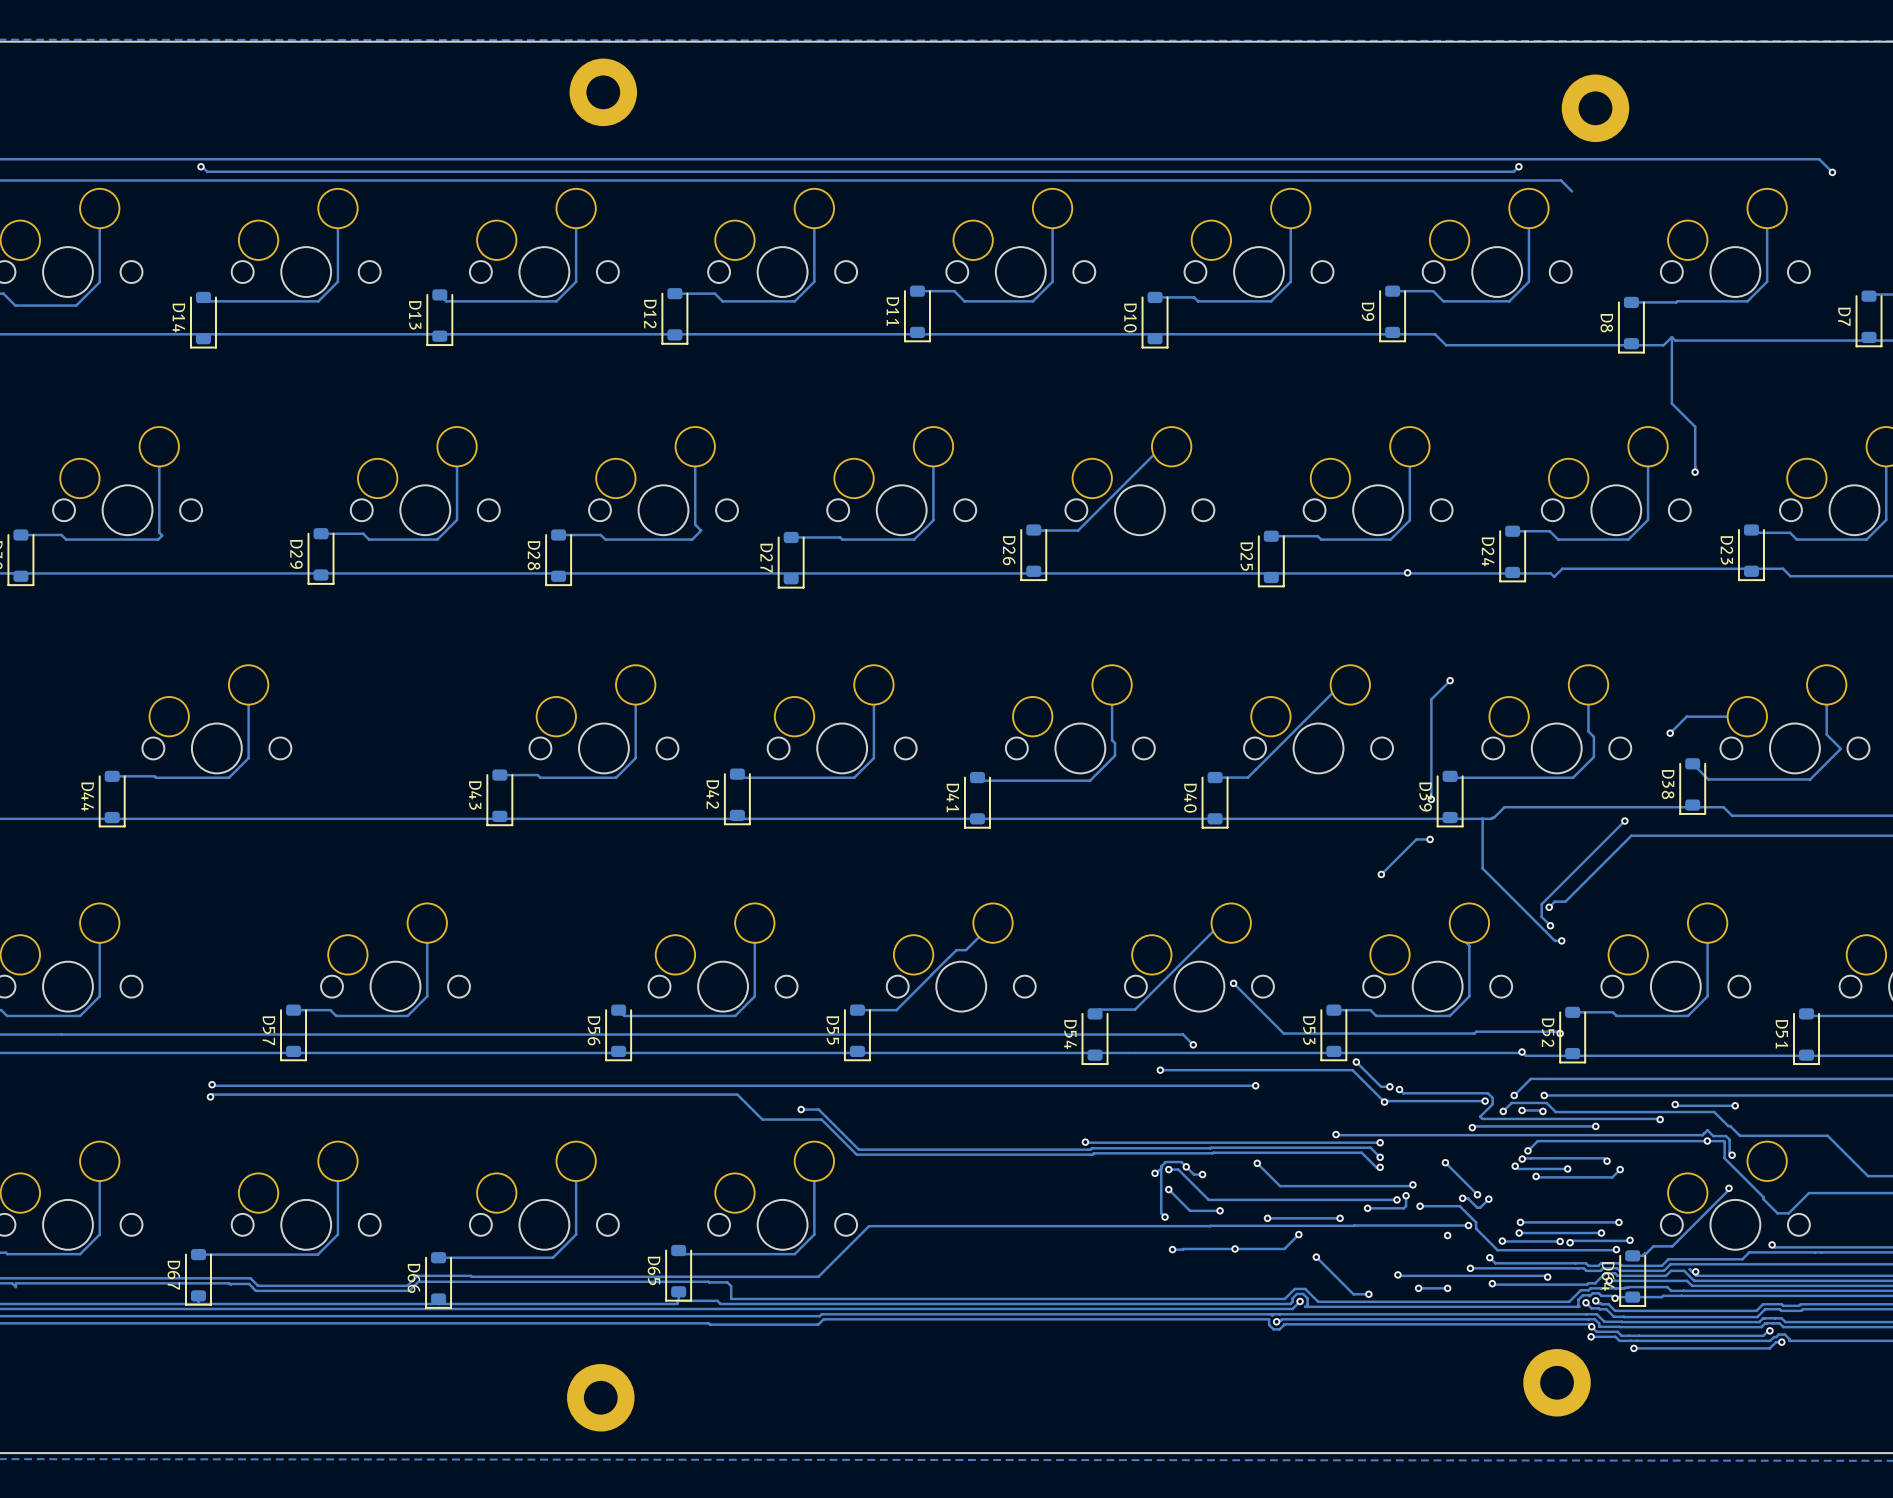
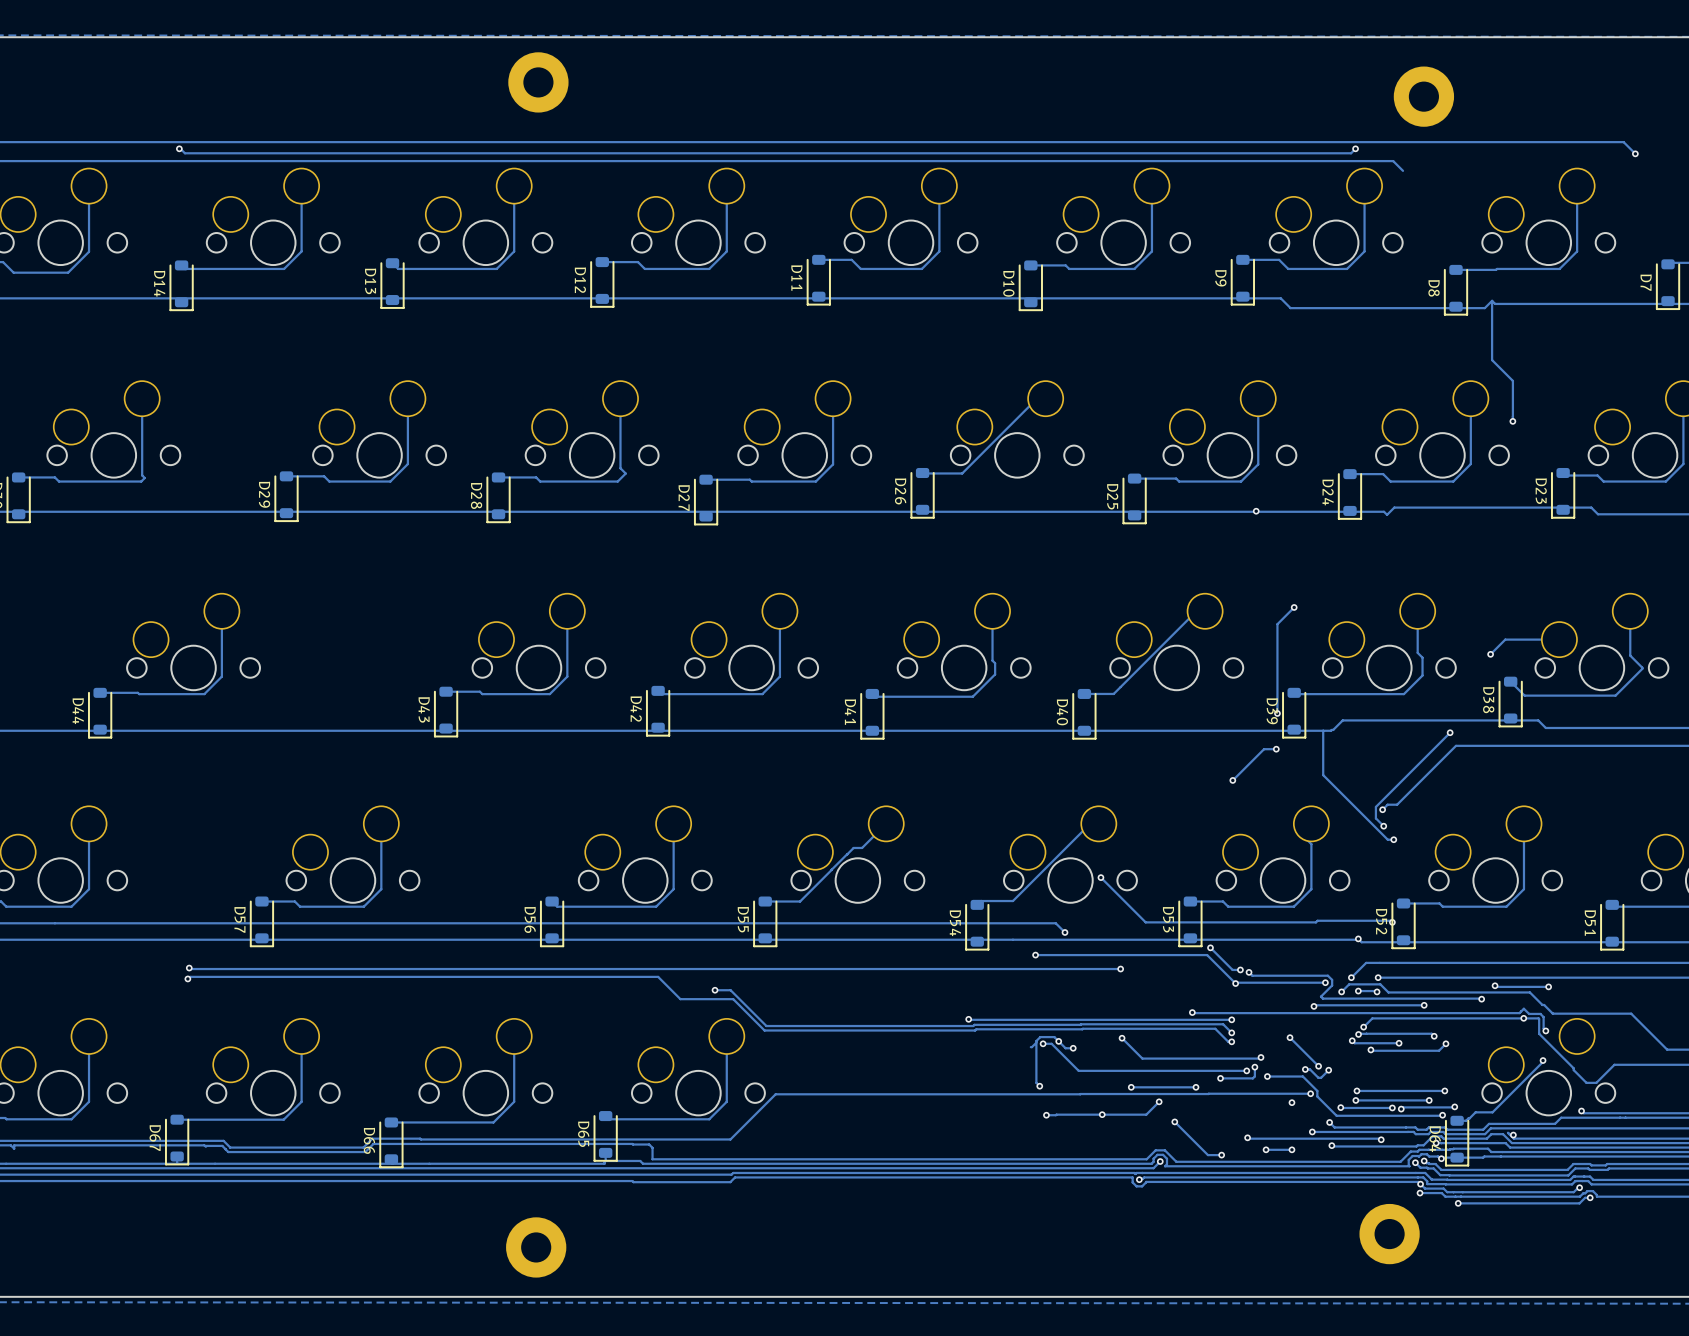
via: (1155, 1173) -> none
track: (1168, 1189) (1190, 1210) (1220, 1210) -> none
via: (1168, 1189) -> none
via: (1220, 1210) -> none

